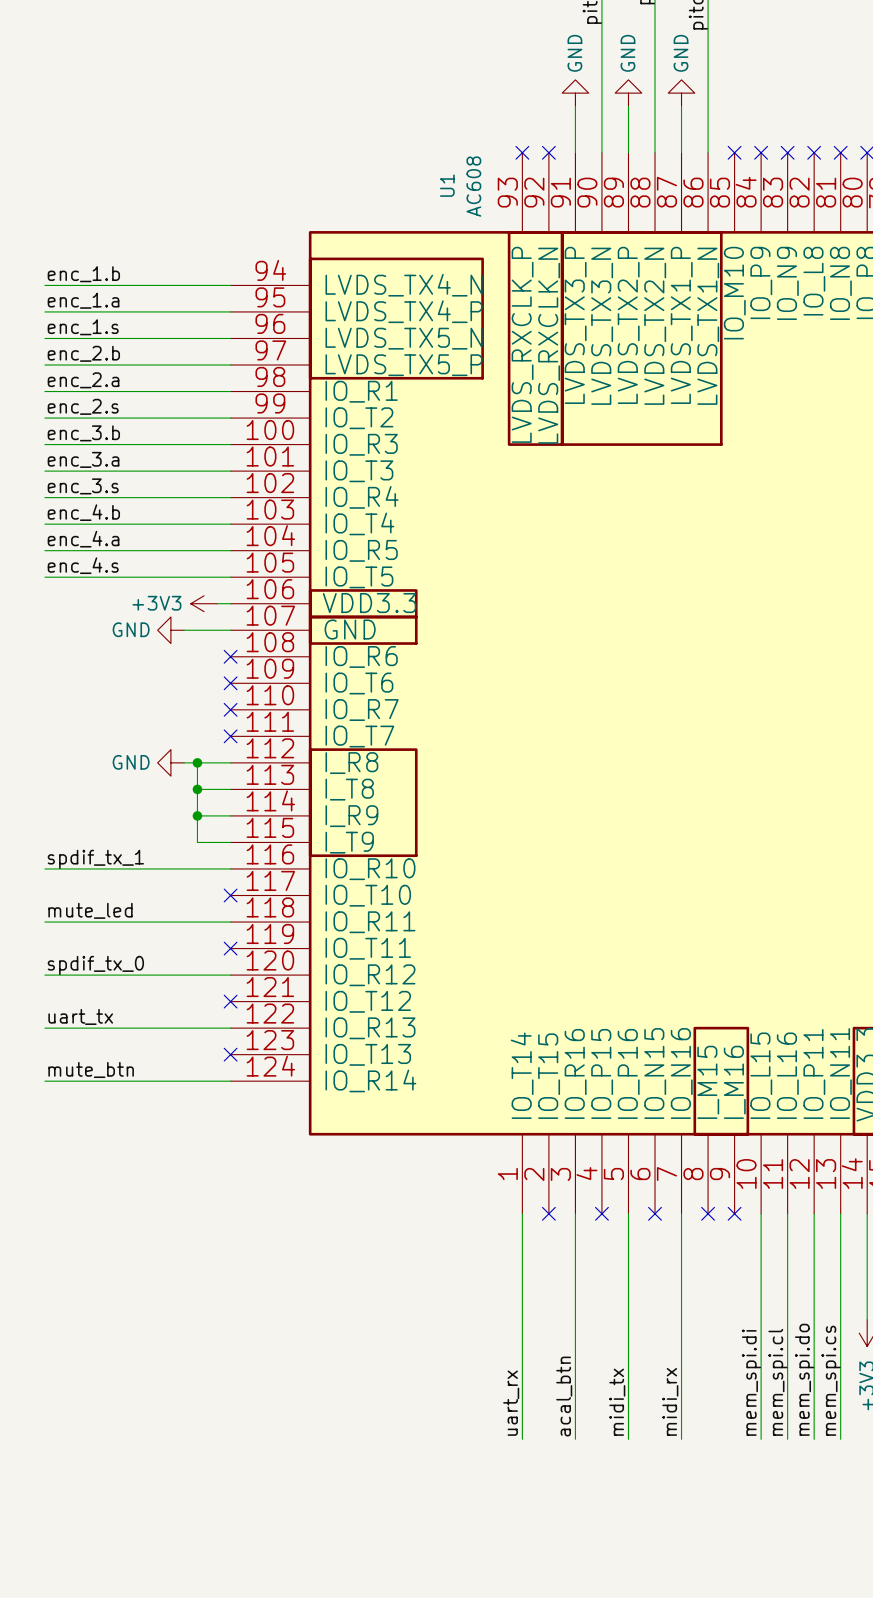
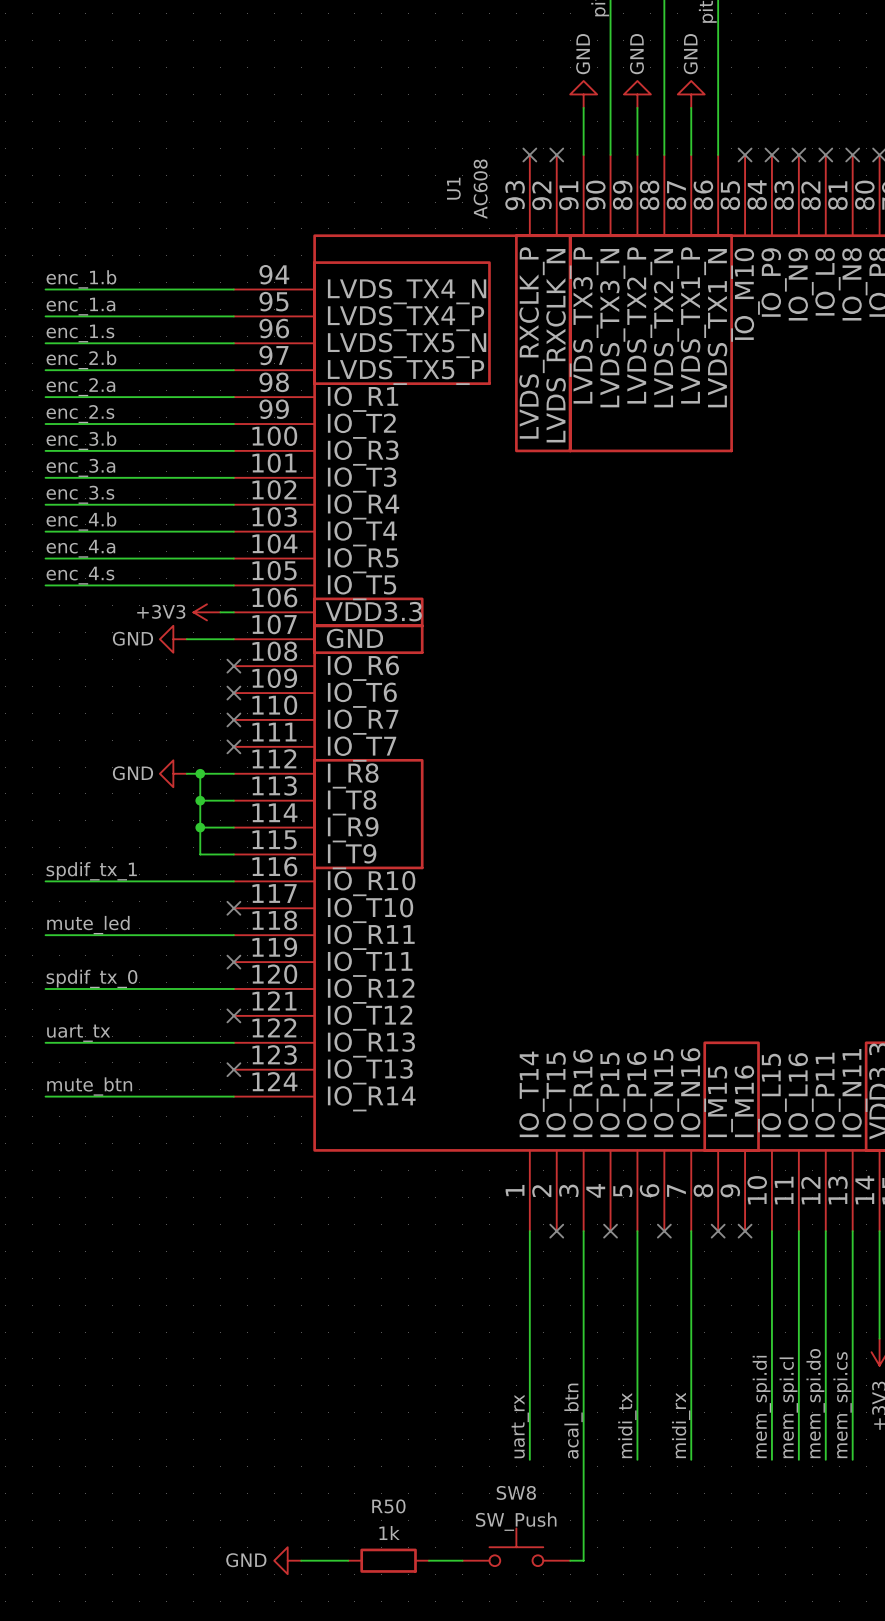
wire: none -> (583, 1459) (583, 1560) (570, 1560)
SW8: none -> SW_Push (516, 1547)
power symbol: none -> GND (287, 1560)
wire: none -> (301, 1560) (348, 1560)
R50: none -> 1k (388, 1560)
wire: none -> (428, 1560) (462, 1560)

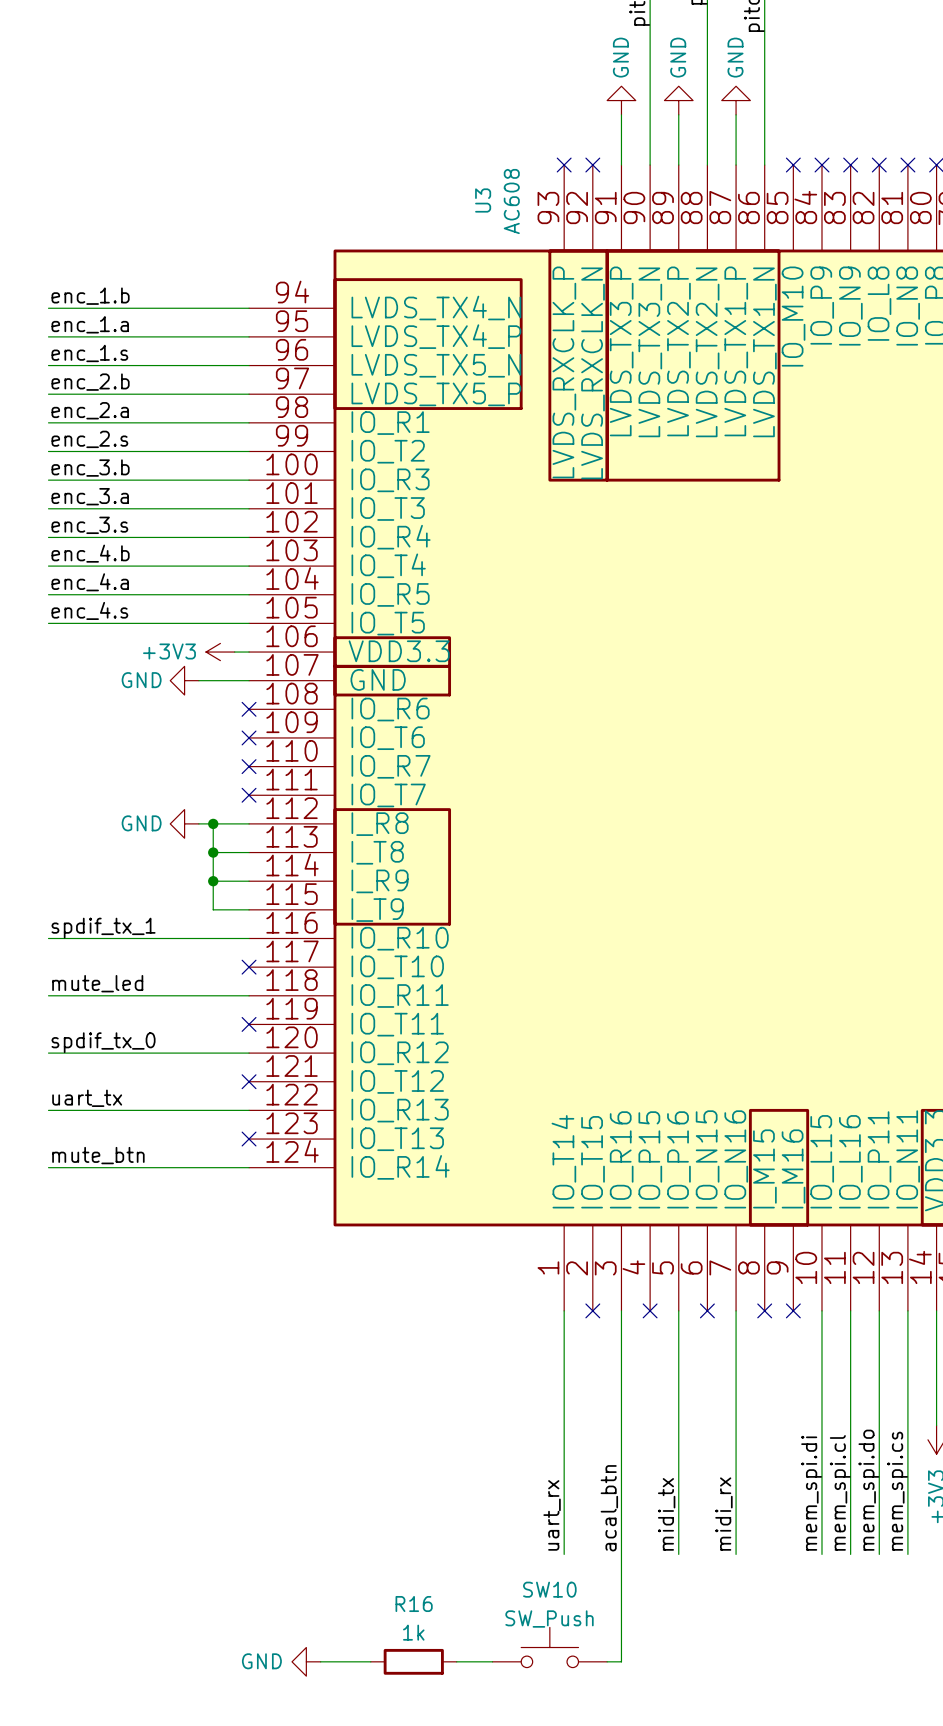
U1 name: U1 (453, 188) -> U3 (483, 200)
SW8 name: SW8 (516, 1492) -> SW10 (549, 1589)
R50 name: R50 (388, 1506) -> R16 (414, 1604)

